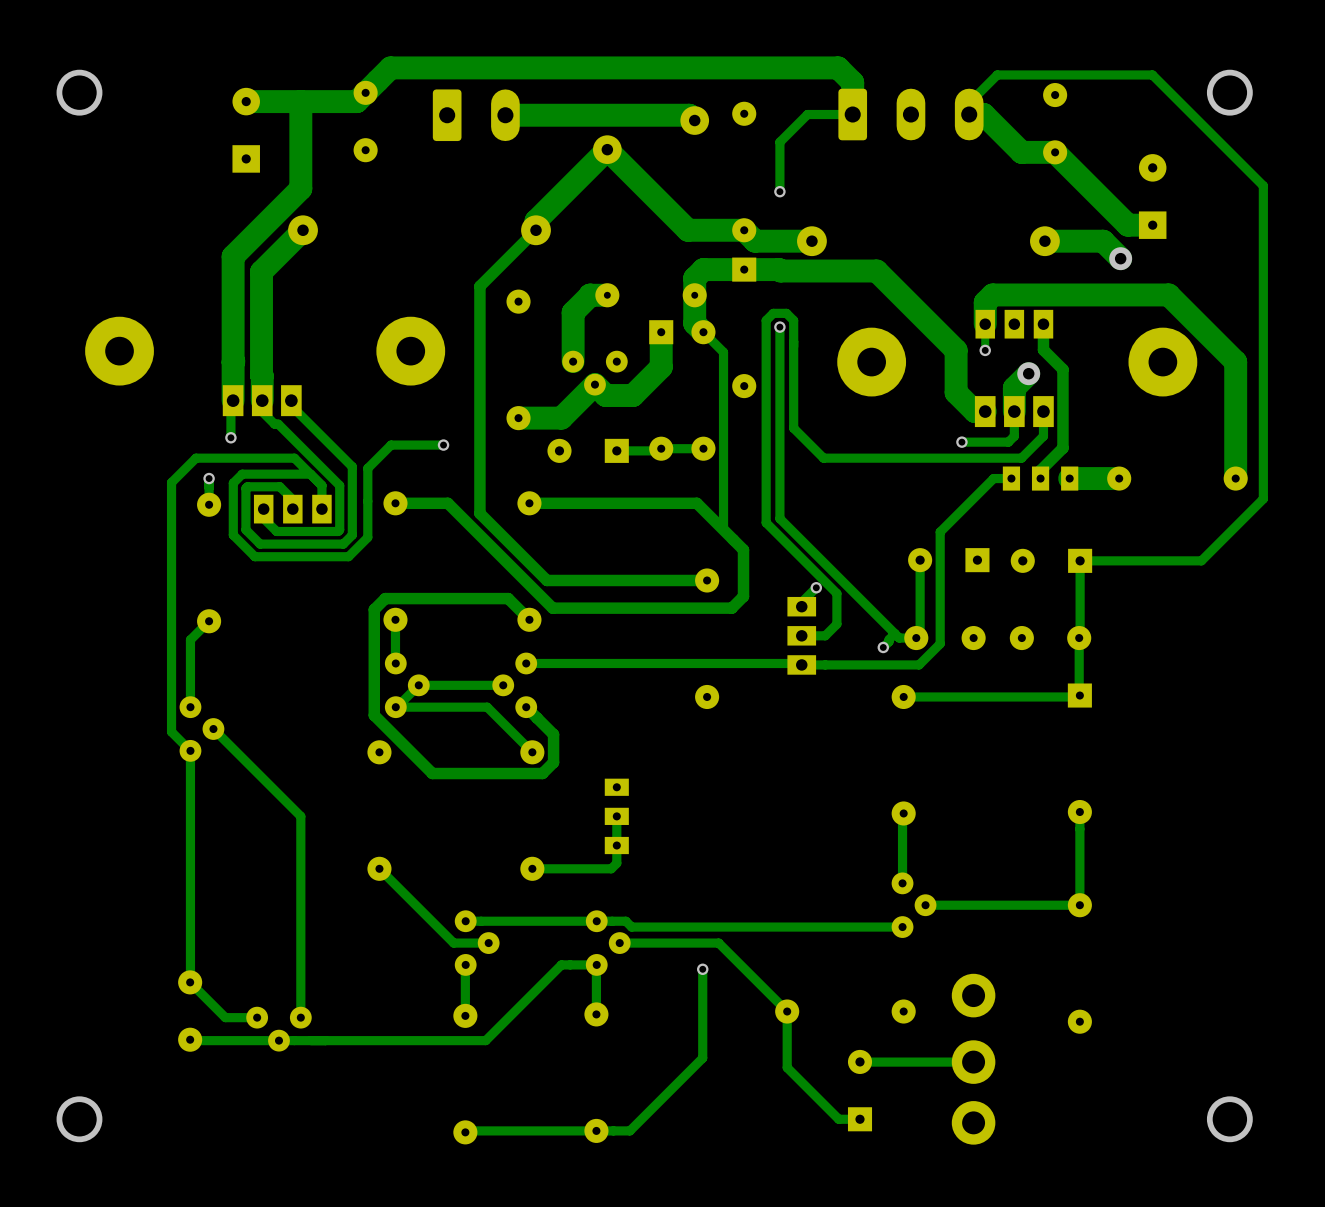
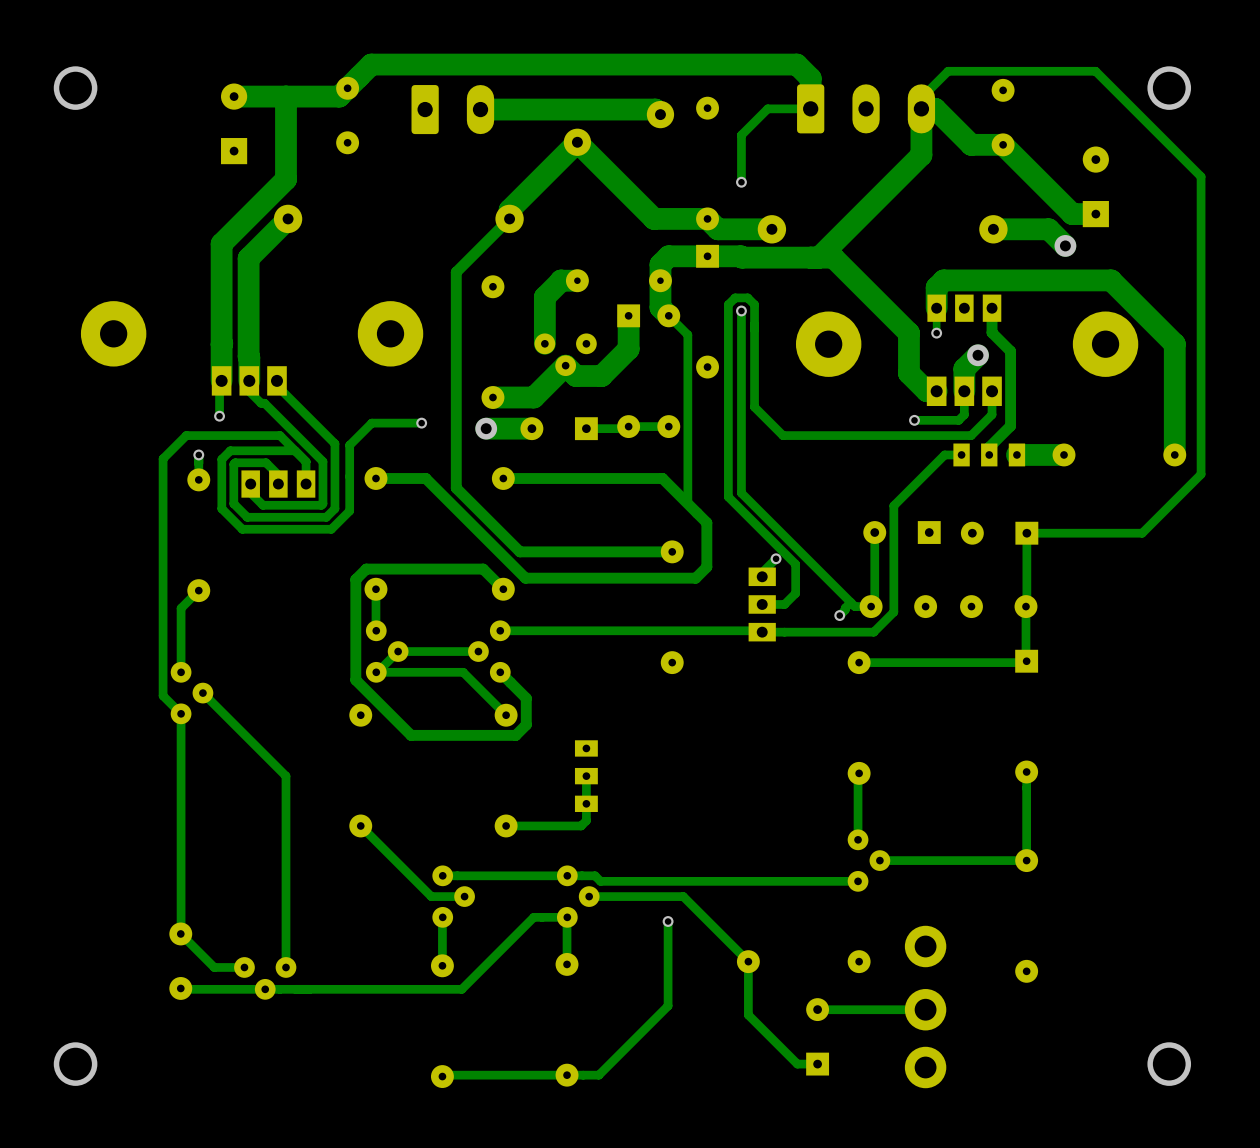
track: none -> (921, 108) (921, 155) (818, 257)
via: none -> (486, 428)
track: none -> (531, 428) (486, 428)

